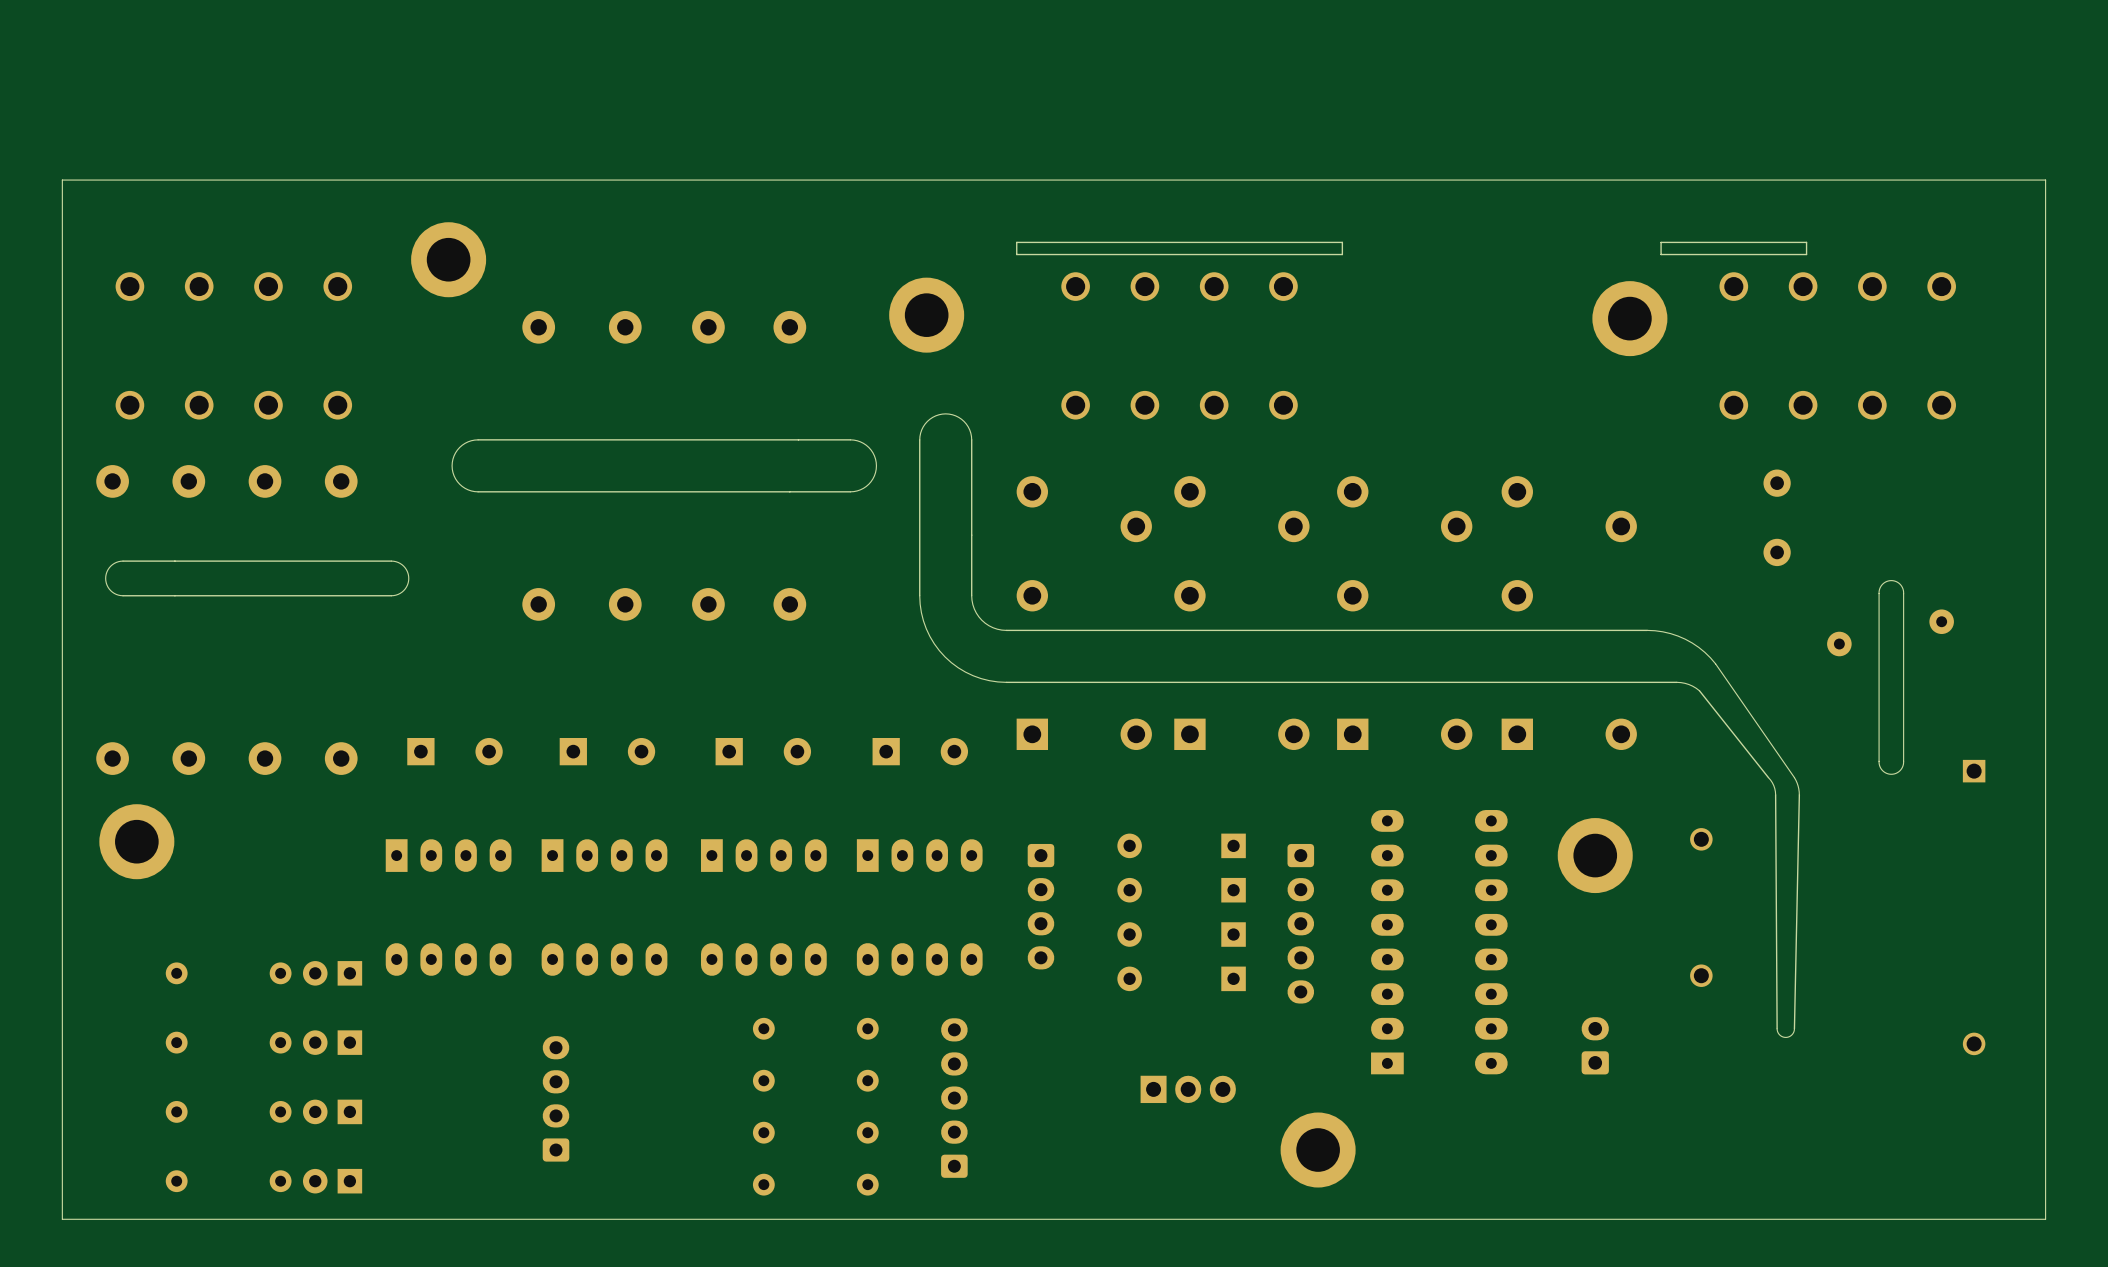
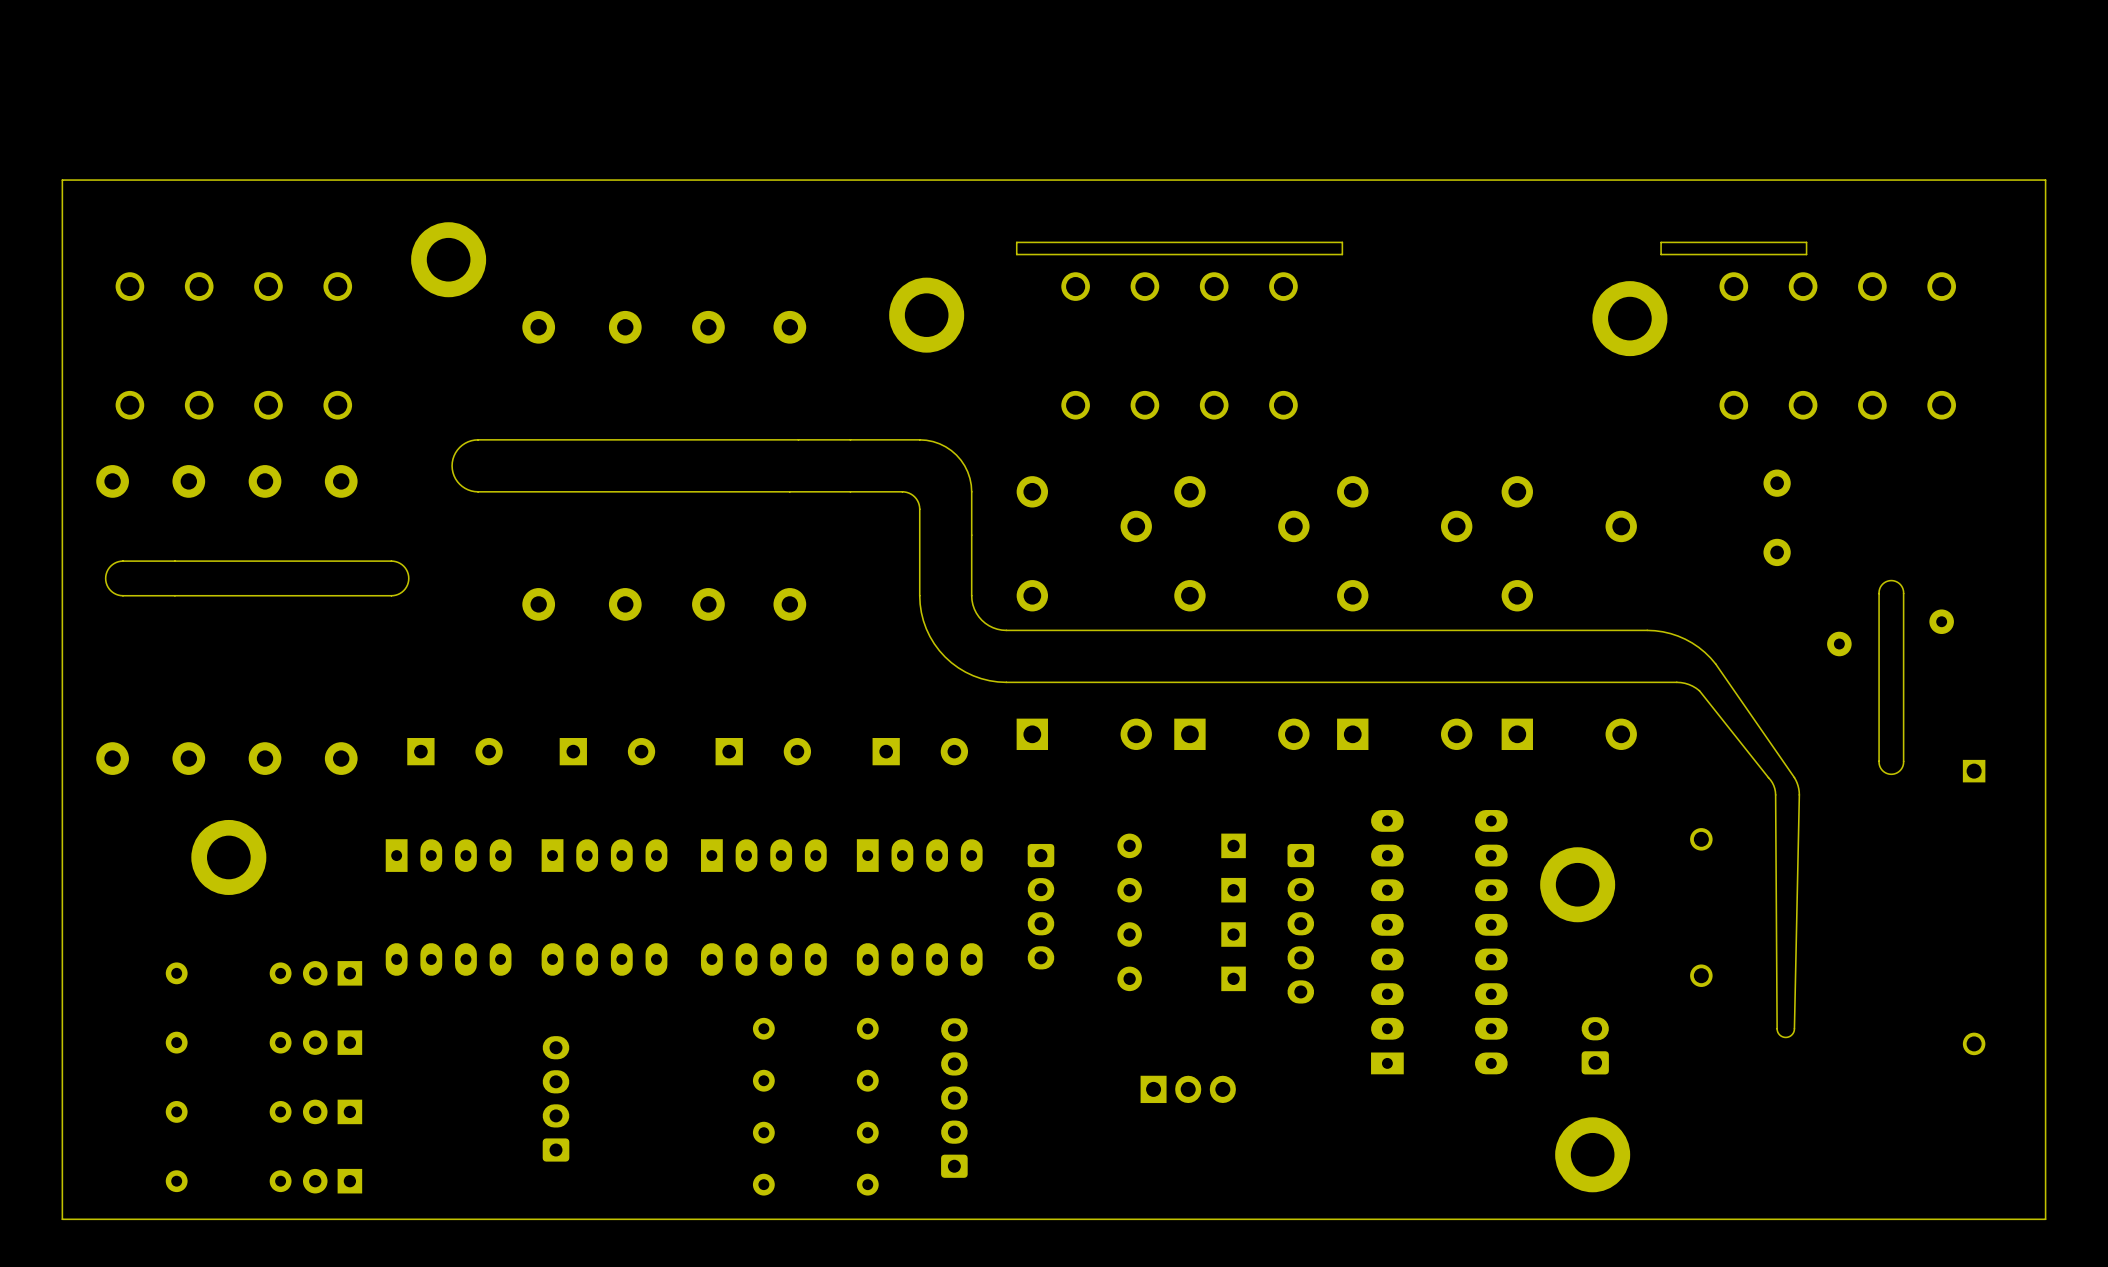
board edge: (850, 439) (860, 441) (868, 447) (874, 455) (876, 465) (874, 475) (868, 484) (860, 489) (850, 491) -> (919, 509) (916, 498) (906, 492) (850, 491)
board edge: (971, 491) (971, 439) (969, 429) (964, 421) (955, 415) (938, 414) (927, 421) (920, 433) (919, 509) -> (971, 491) (969, 478) (964, 465) (956, 455) (939, 443) (919, 439) (850, 439)
part position: (136, 841) -> (228, 857)
part position: (1595, 855) -> (1577, 884)
part: (1318, 1150) -> none
part: none -> (1592, 1154)

